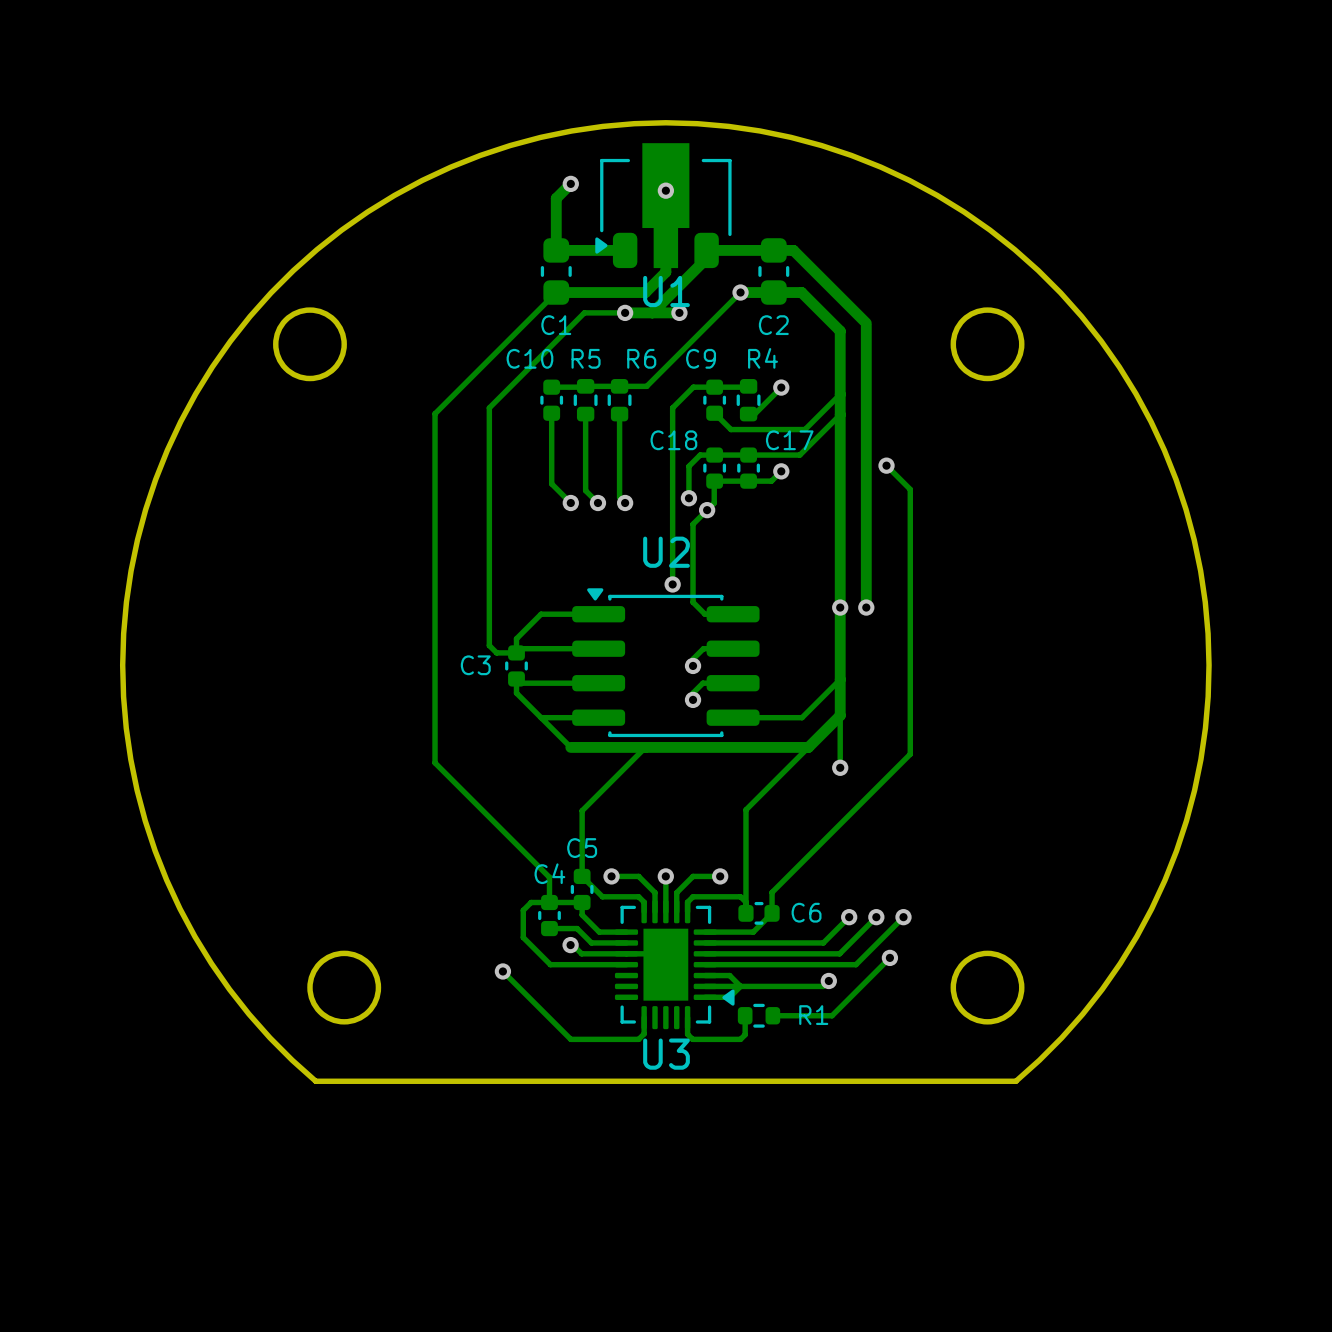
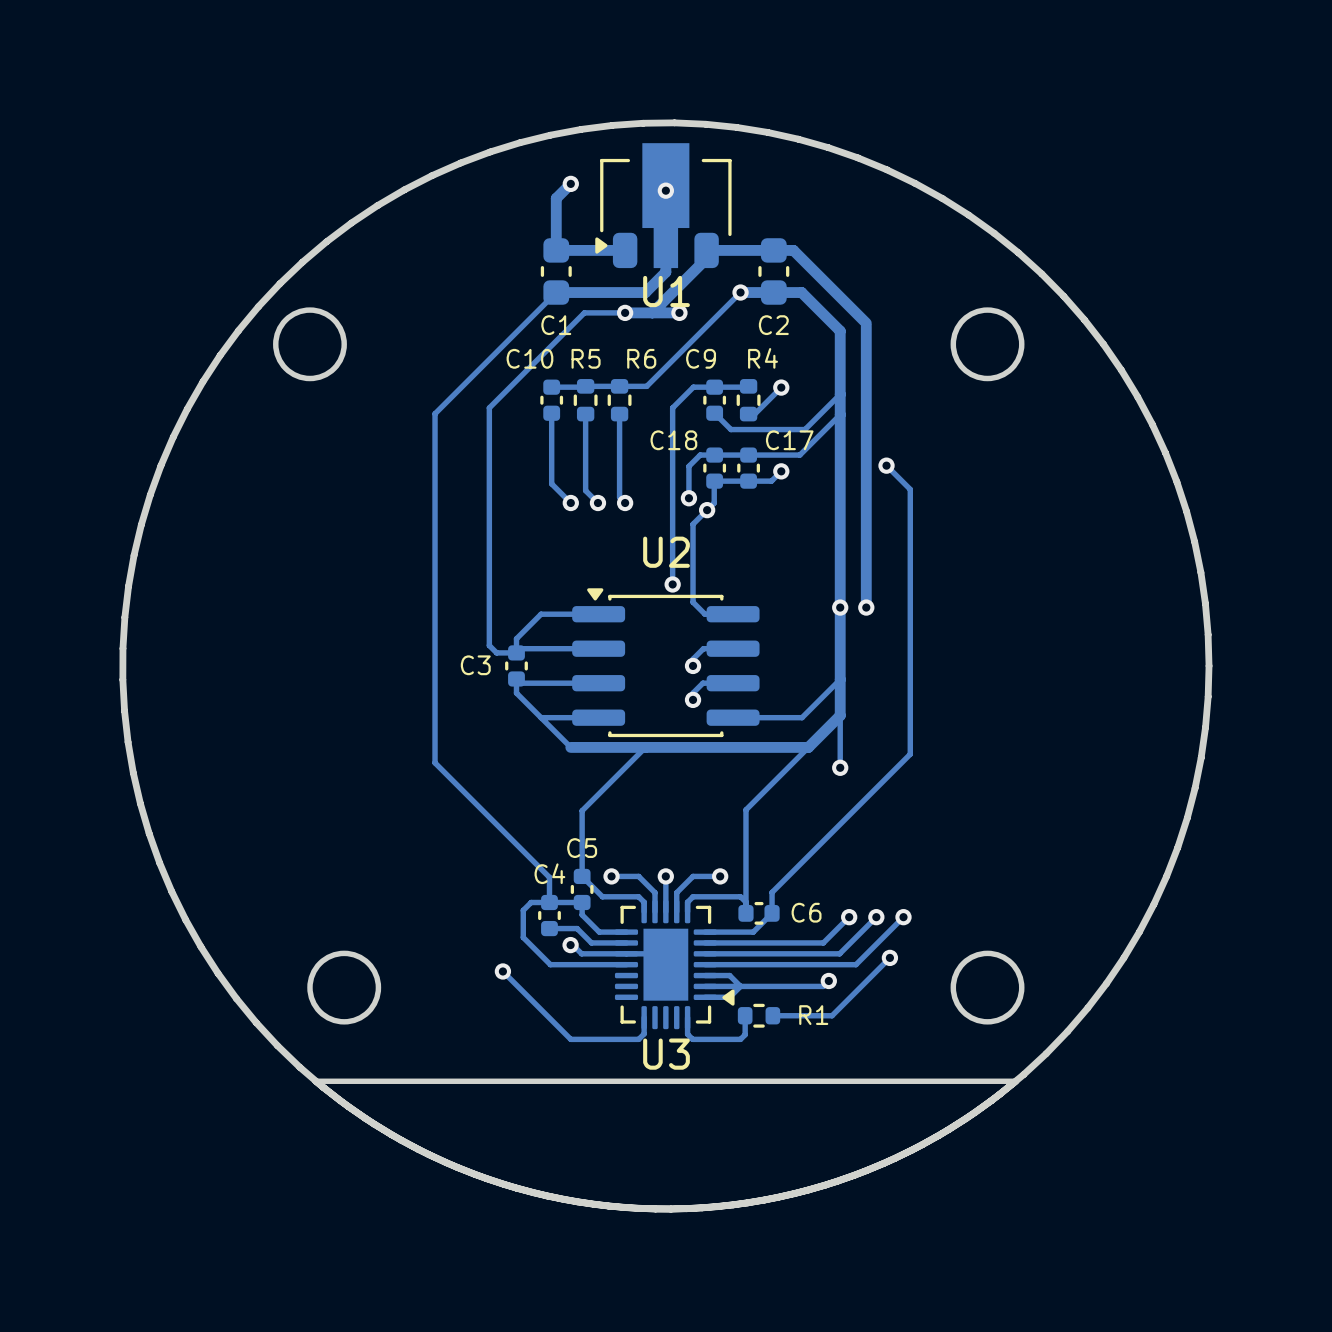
board edge: (1015, 1081) (1061, 1037) (1082, 1014) (1102, 989) (1136, 936) (1151, 908) (1176, 850) (1194, 790) (1205, 728) (1208, 696) (1208, 633) (1205, 602) (1194, 540) (1176, 479) (1151, 421) (1119, 367) (1101, 341) (1060, 292) (1038, 270) (1014, 249) (964, 211) (909, 180) (880, 167) (821, 145) (760, 131) (697, 123) (665, 122) (602, 126) (571, 131) (510, 145) (480, 155) (422, 180) (367, 211) (341, 230) (293, 270) (271, 292) (230, 341) (212, 367) (180, 421) (155, 479) (145, 509) (131, 570) (126, 602) (122, 665) (126, 728) (130, 759) (145, 820) (155, 850) (180, 908) (211, 963) (249, 1014) (269, 1037) (315, 1081) -> (1015, 1081) (991, 1100) (965, 1118) (939, 1135) (911, 1150) (883, 1163) (854, 1175) (824, 1185) (794, 1193) (764, 1200) (733, 1204) (702, 1207) (670, 1209) (639, 1208) (608, 1206) (577, 1201) (546, 1195) (516, 1188) (486, 1178) (457, 1167) (428, 1154) (401, 1140) (374, 1124) (348, 1106) (323, 1087) (299, 1067) (277, 1045) (236, 998) (217, 973) (185, 919) (159, 862) (140, 803) (128, 742) (122, 679) (124, 617) (134, 555) (150, 495) (160, 465) (187, 409) (220, 355) (258, 306) (302, 262) (351, 223) (404, 189) (460, 162) (520, 142) (581, 129) (643, 123) (674, 122) (736, 127) (798, 139) (857, 157) (915, 183) (968, 215) (1018, 252) (1063, 296) (1103, 344) (1137, 396) (1165, 452) (1186, 511) (1200, 572) (1208, 634) (1208, 696) (1201, 758) (1195, 788) (1177, 847) (1153, 904) (1123, 958) (1087, 1008) (1046, 1053) (1023, 1074) (999, 1094) (975, 1112) (949, 1129) (922, 1144) (894, 1158) (866, 1170) (837, 1181) (808, 1190) (778, 1197) (747, 1202) (717, 1206) (686, 1208) (655, 1209) (624, 1207) (594, 1204) (563, 1199) (533, 1192) (503, 1184) (474, 1174) (446, 1162) (418, 1149) (391, 1134) (365, 1118) (339, 1100) (315, 1081)

